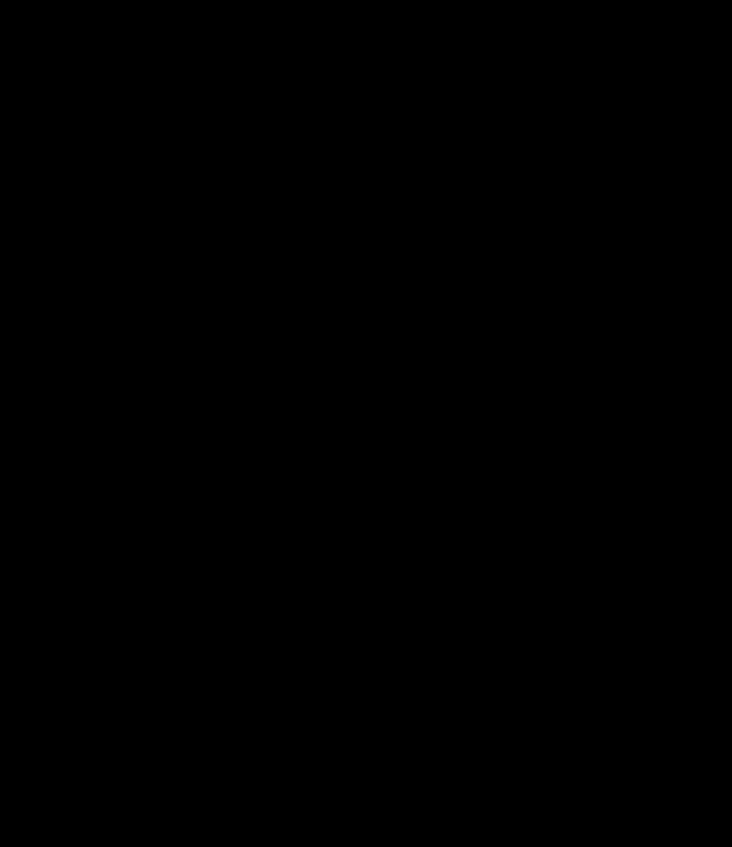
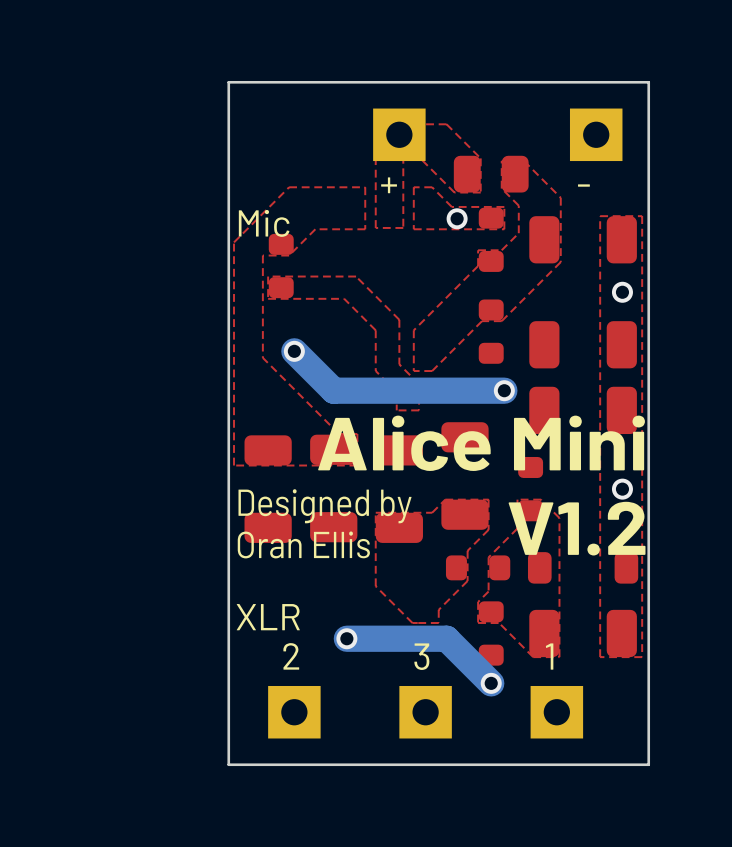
board edge: none -> (648, 82) (228, 82) (228, 764) (648, 764) (648, 82)
top zone outline: none -> (446, 124) (375, 124) (375, 227) (403, 227) (403, 155) (417, 155) (454, 192) (480, 192) (480, 158) (446, 124)
part: none -> (399, 134)
part: none -> (596, 134)
top zone outline: none -> (524, 161) (501, 161) (501, 188) (518, 205) (518, 233) (501, 250) (478, 250) (478, 266) (413, 330) (413, 371) (432, 371) (482, 321) (501, 321) (560, 262) (560, 197) (524, 161)
part: none -> (491, 174)
text: none -> + (389, 185)
text: none -> - (583, 185)
top zone outline: none -> (365, 187) (289, 187) (234, 242) (234, 465) (357, 465) (357, 434) (338, 434) (262, 357) (262, 255) (289, 255) (315, 229) (365, 229) (365, 187)
top zone outline: none -> (432, 187) (451, 206) (504, 206) (504, 229) (413, 229) (413, 187) (432, 187)
top zone outline: none -> (642, 216) (600, 216) (600, 657) (642, 657) (642, 216)
via: none -> (457, 218)
text: none -> Mic (264, 223)
part: none -> (491, 239)
part: none -> (583, 239)
part: none -> (281, 266)
top zone outline: none -> (356, 276) (399, 319) (399, 364) (419, 384) (419, 410) (396, 410) (396, 392) (375, 371) (375, 330) (344, 298) (268, 298) (268, 276) (356, 276)
via: none -> (622, 292)
part: none -> (491, 331)
part: none -> (583, 344)
bottom track: none -> (294, 351) (333, 390) (504, 390)
via: none -> (294, 351)
via: none -> (504, 390)
part: none -> (583, 410)
text: none -> Alice Mini (481, 443)
part: none -> (464, 476)
part: none -> (333, 488)
part: none -> (268, 489)
part: none -> (399, 489)
part: none -> (530, 489)
via: none -> (622, 489)
top zone outline: none -> (488, 499) (445, 499) (432, 512) (375, 512) (375, 586) (412, 622) (438, 622) (438, 609) (467, 581) (467, 550) (488, 529) (488, 499)
top zone outline: none -> (541, 499) (517, 499) (517, 528) (488, 557) (488, 591) (478, 601) (478, 622) (499, 622) (533, 657) (559, 657) (559, 518) (541, 499)
text: none -> Designed by (325, 506)
text: none -> V1.2 (577, 528)
text: none -> Oran Ellis (303, 544)
part: none -> (478, 567)
part: none -> (583, 567)
text: none -> XLR (268, 617)
part: none -> (491, 633)
part: none -> (583, 633)
bottom track: none -> (346, 638) (446, 638) (491, 683)
via: none -> (346, 638)
text: none -> 2 (291, 656)
text: none -> 3 (421, 656)
text: none -> 1 (549, 656)
via: none -> (491, 683)
part: none -> (294, 712)
part: none -> (425, 712)
part: none -> (556, 712)

